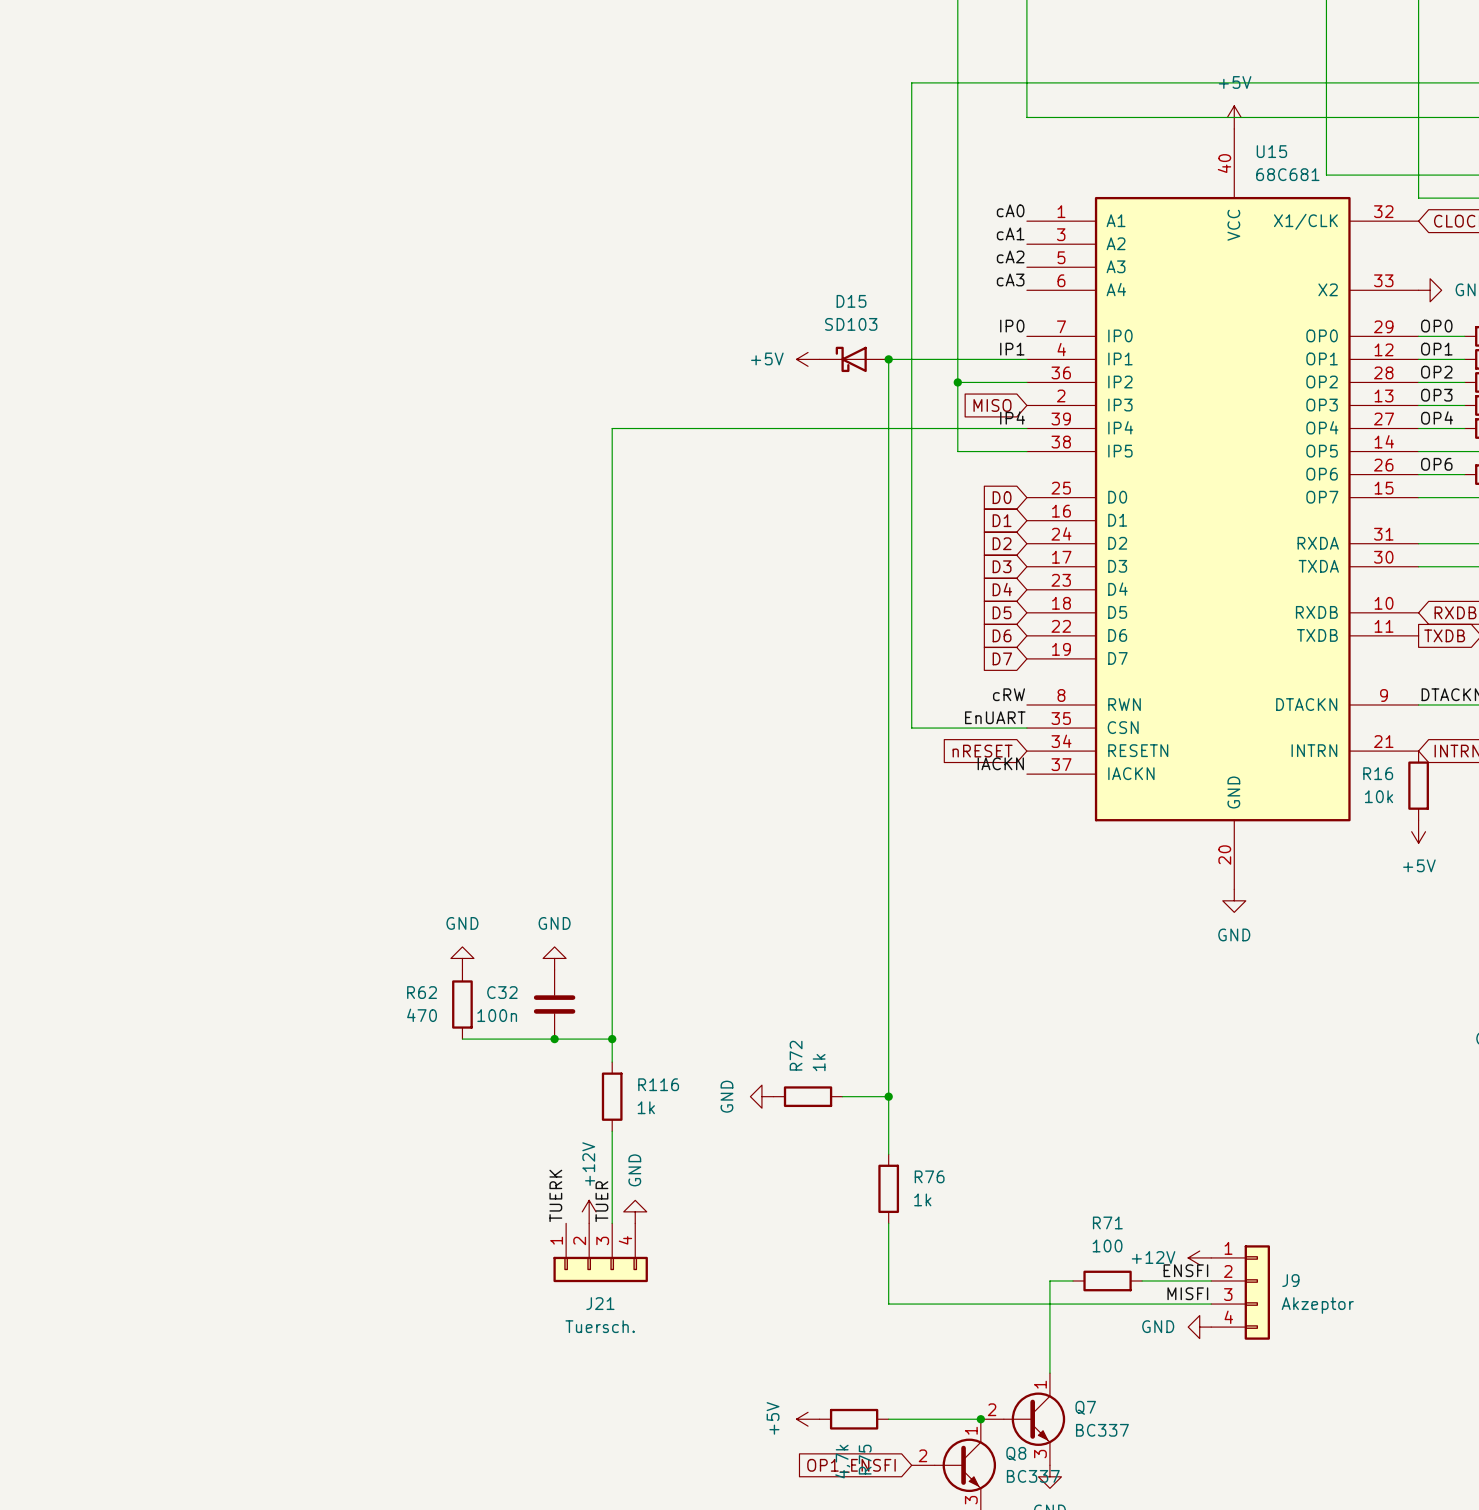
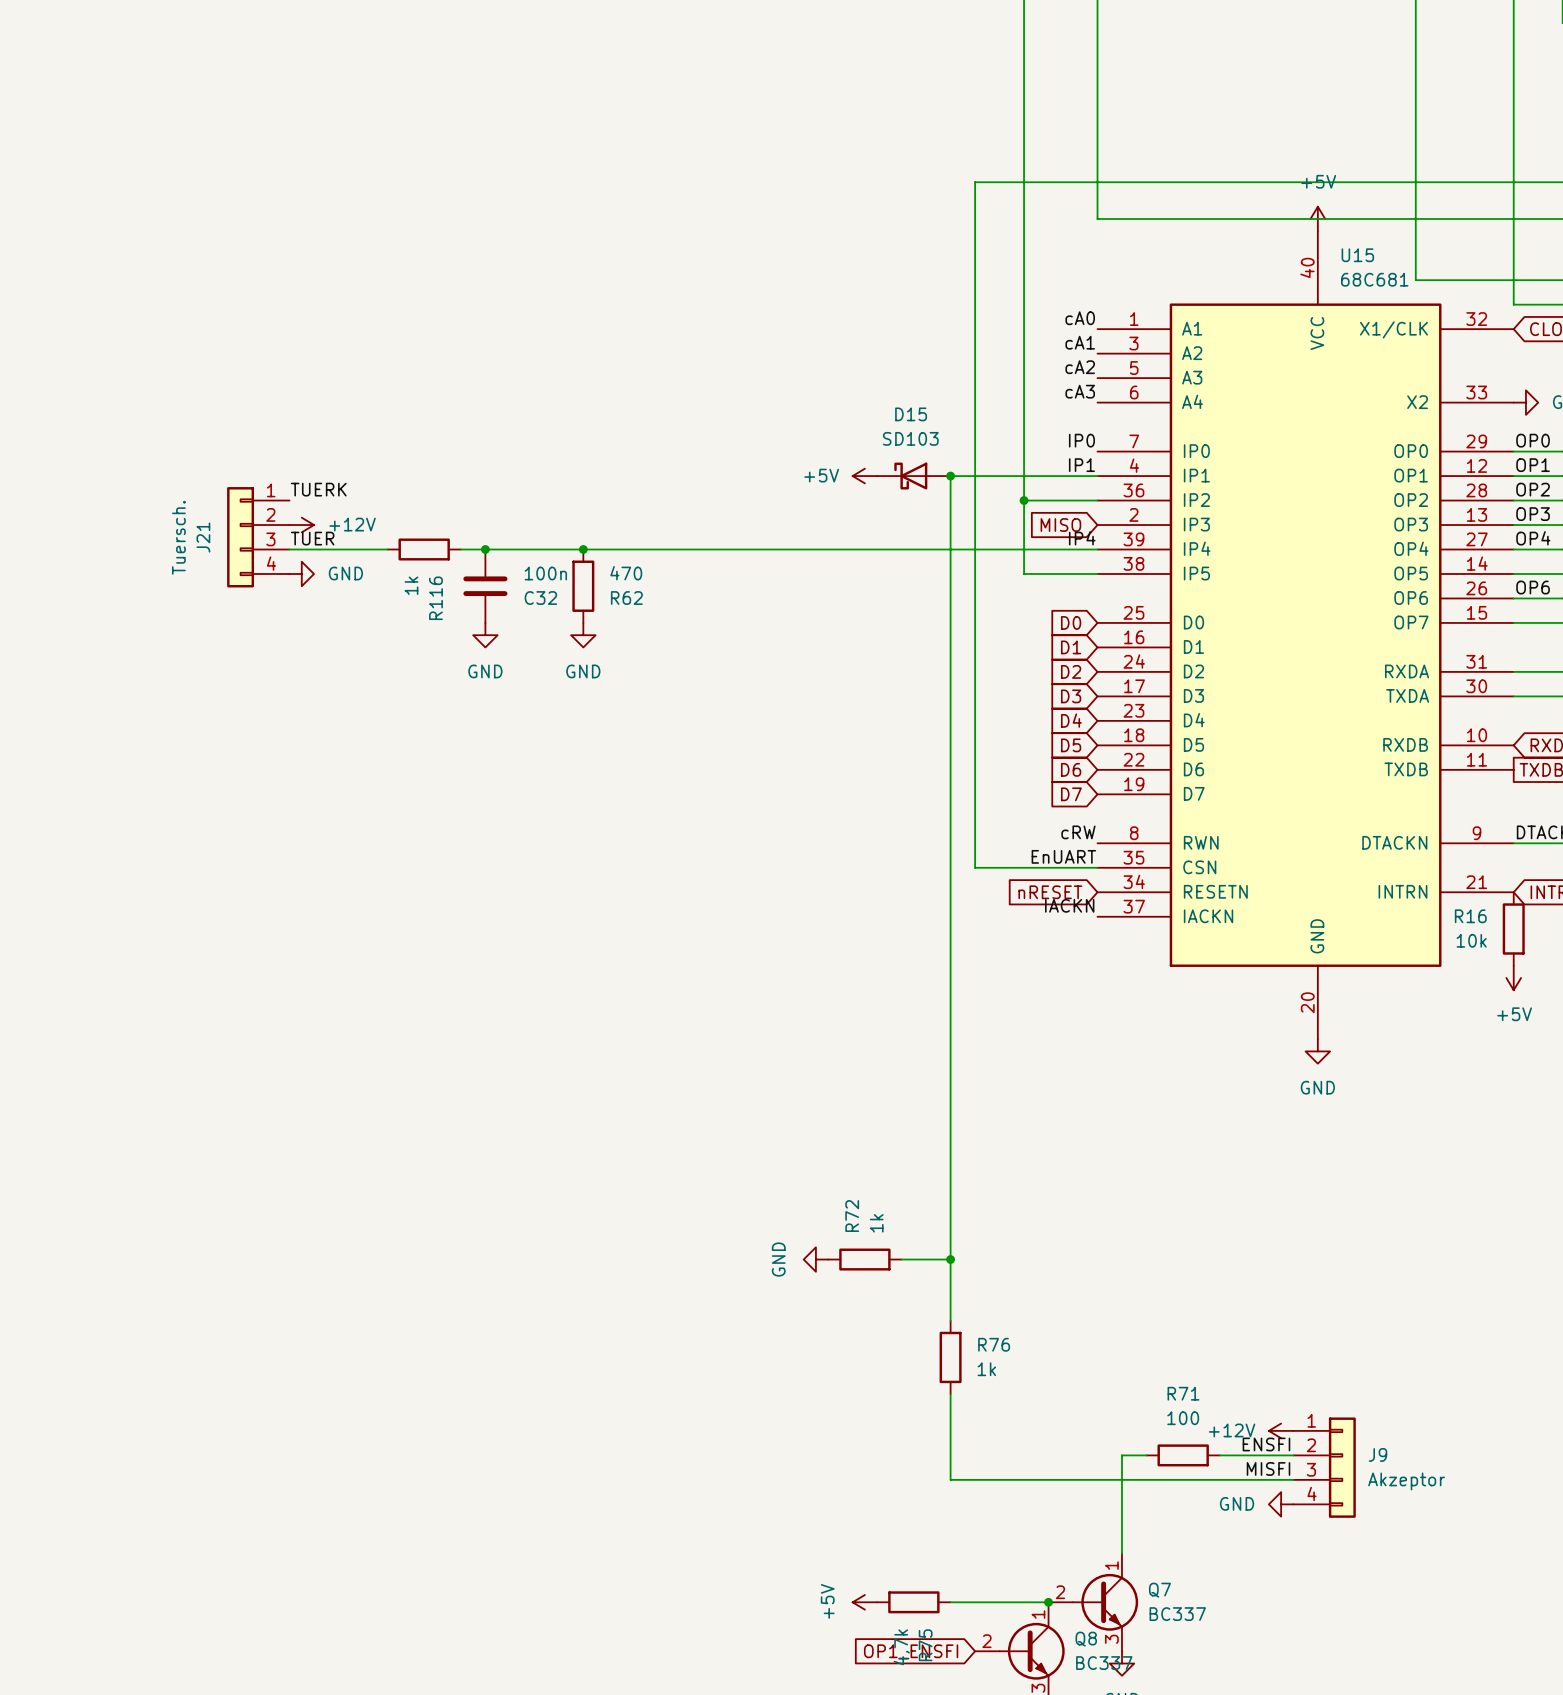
label: none -> TUERK (318, 489)
power symbol: none -> +12V (301, 525)
label: none -> TUER (312, 538)
wire: none -> (289, 549) (387, 549)
junction: none -> (485, 549)
junction: none -> (583, 549)
wire: (612, 428) (612, 1062) -> (656, 549) (460, 549)
power symbol: none -> GND (301, 573)
power symbol: none -> GND (485, 635)
power symbol: none -> GND (583, 635)
power symbol: GND (462, 958) -> none
power symbol: GND (554, 958) -> none
R62 name position: R62 (422, 992) -> R62 (626, 598)
C32 name position: C32 (502, 992) -> C32 (540, 598)
R62 position: (462, 1004) -> (583, 586)
C32 position: (554, 1004) -> (485, 586)
R62 value position: 470 (422, 1015) -> 470 (626, 573)
C32 value position: 100n (497, 1015) -> 100n (545, 573)
wire: (462, 1039) (612, 1039) -> none
junction: (554, 1039) -> none
junction: (612, 1039) -> none
R116 rotation: 0° (612, 1096) -> 90° clockwise (424, 549)
R116 position: (612, 1096) -> (424, 549)
wire: (612, 1131) (612, 1223) -> none
label: TUERK (555, 1195) -> none
label: TUER (601, 1201) -> none
power symbol: +12V (589, 1211) -> none
power symbol: GND (635, 1211) -> none
J21 position: (600, 1252) -> (258, 537)
J21 rotation: 0° (600, 1269) -> 90° clockwise (240, 537)

